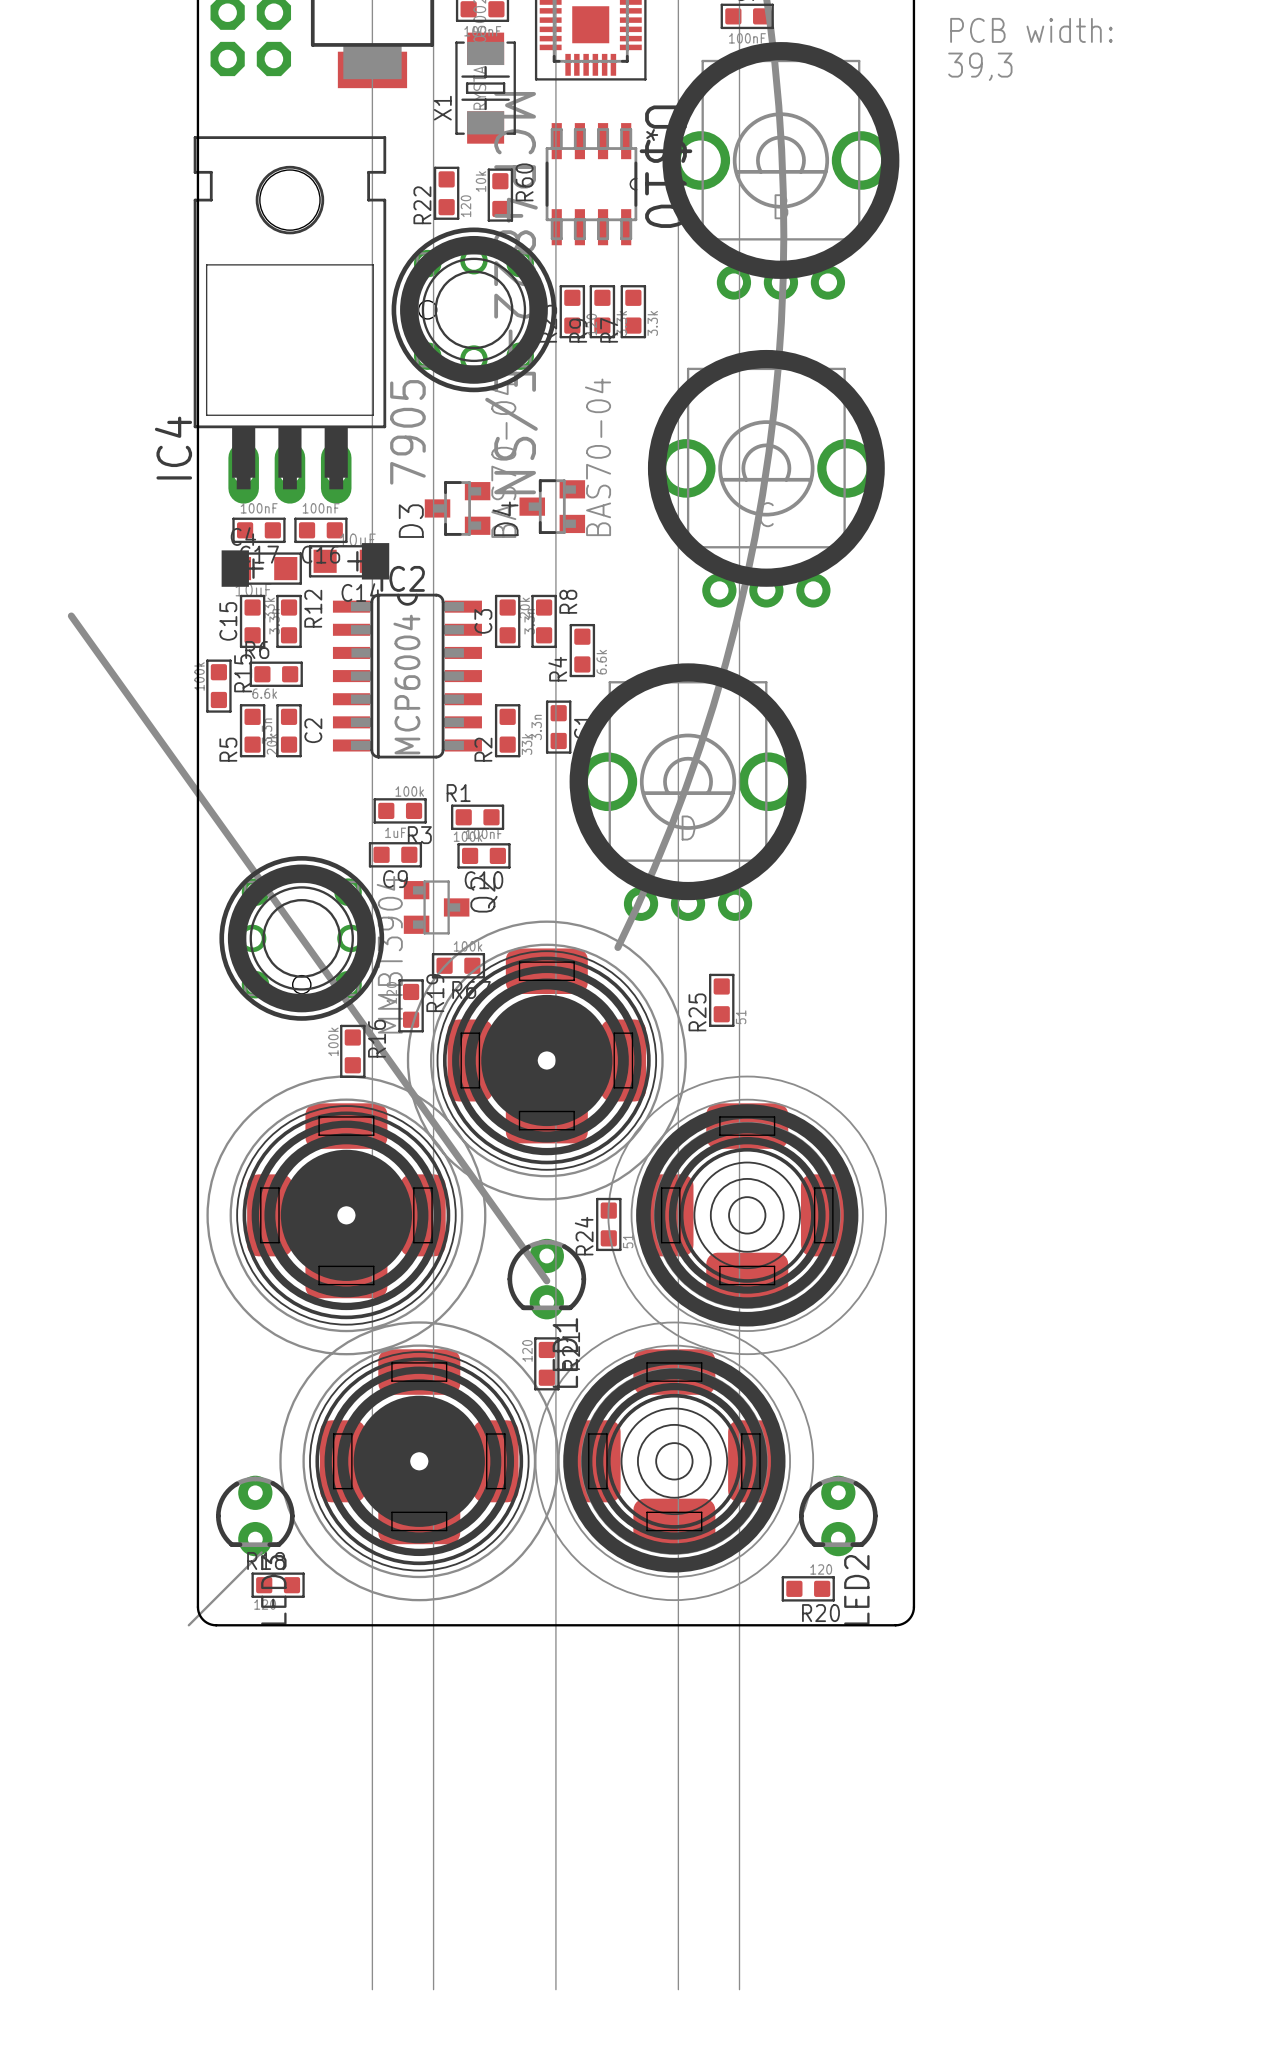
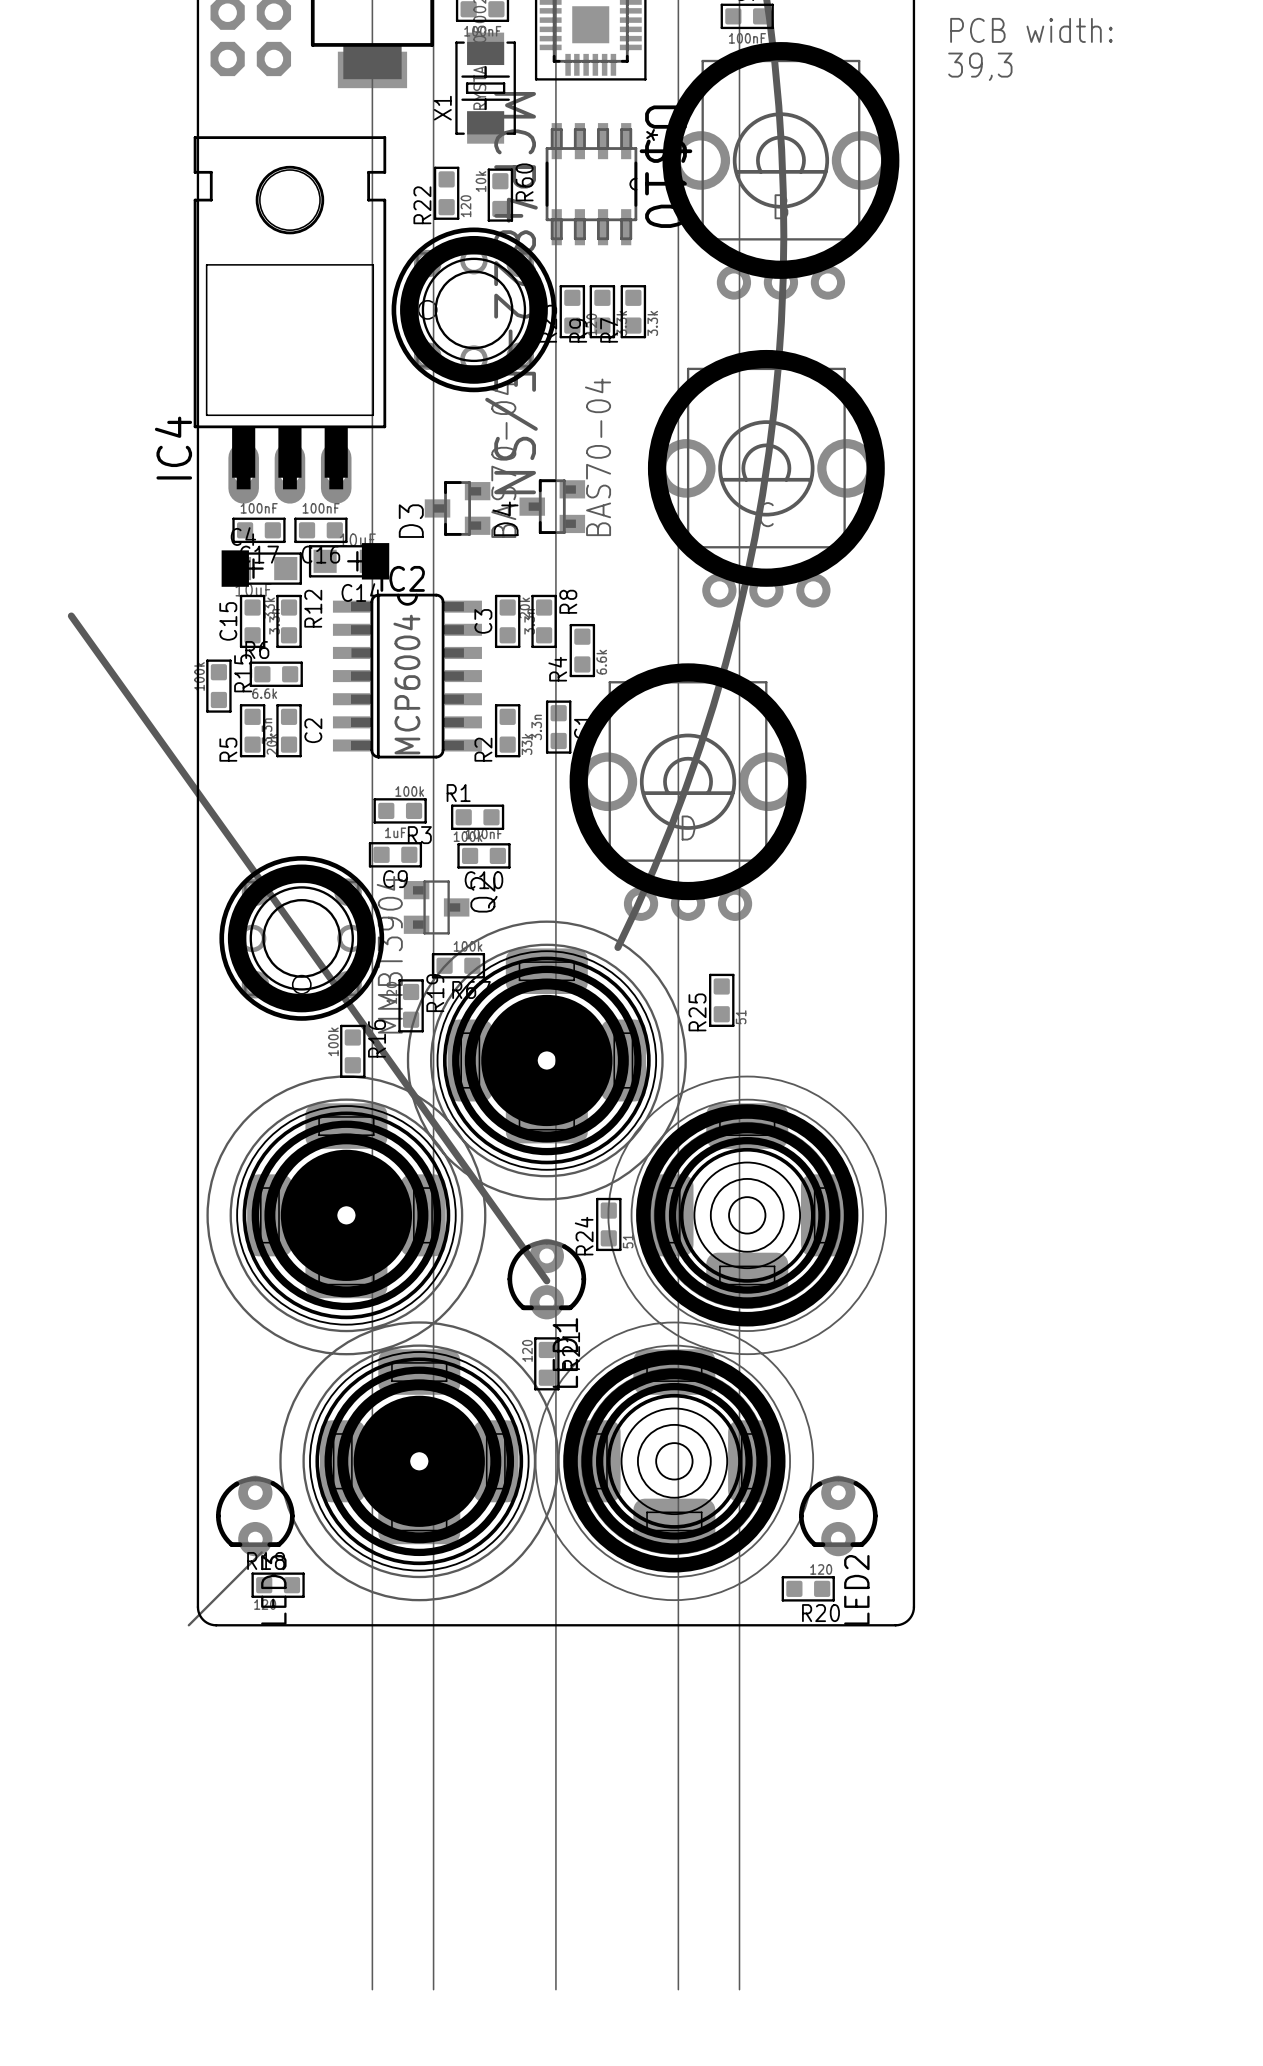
IC4 value: 7905 (407, 432) -> none

